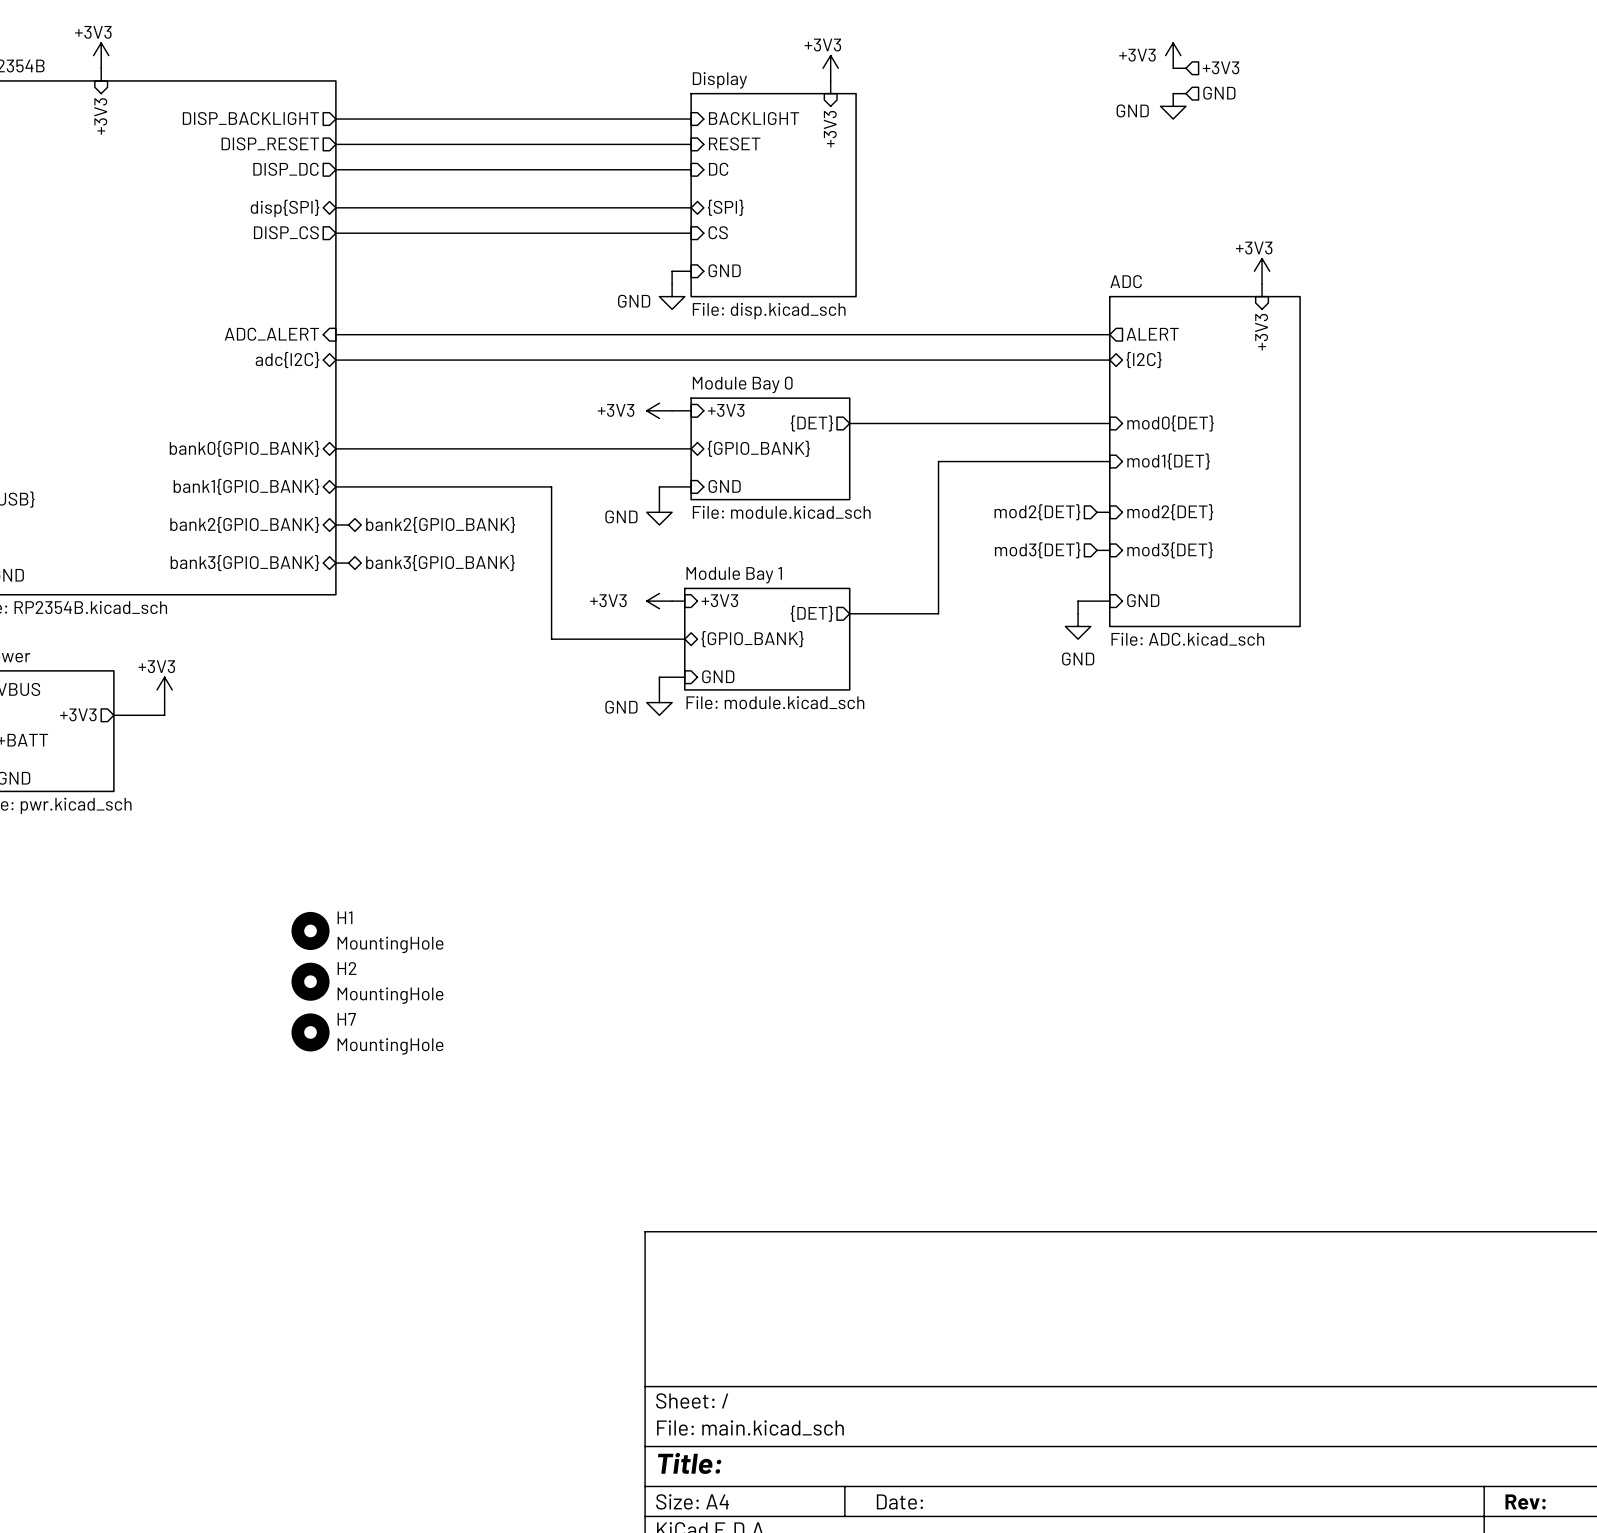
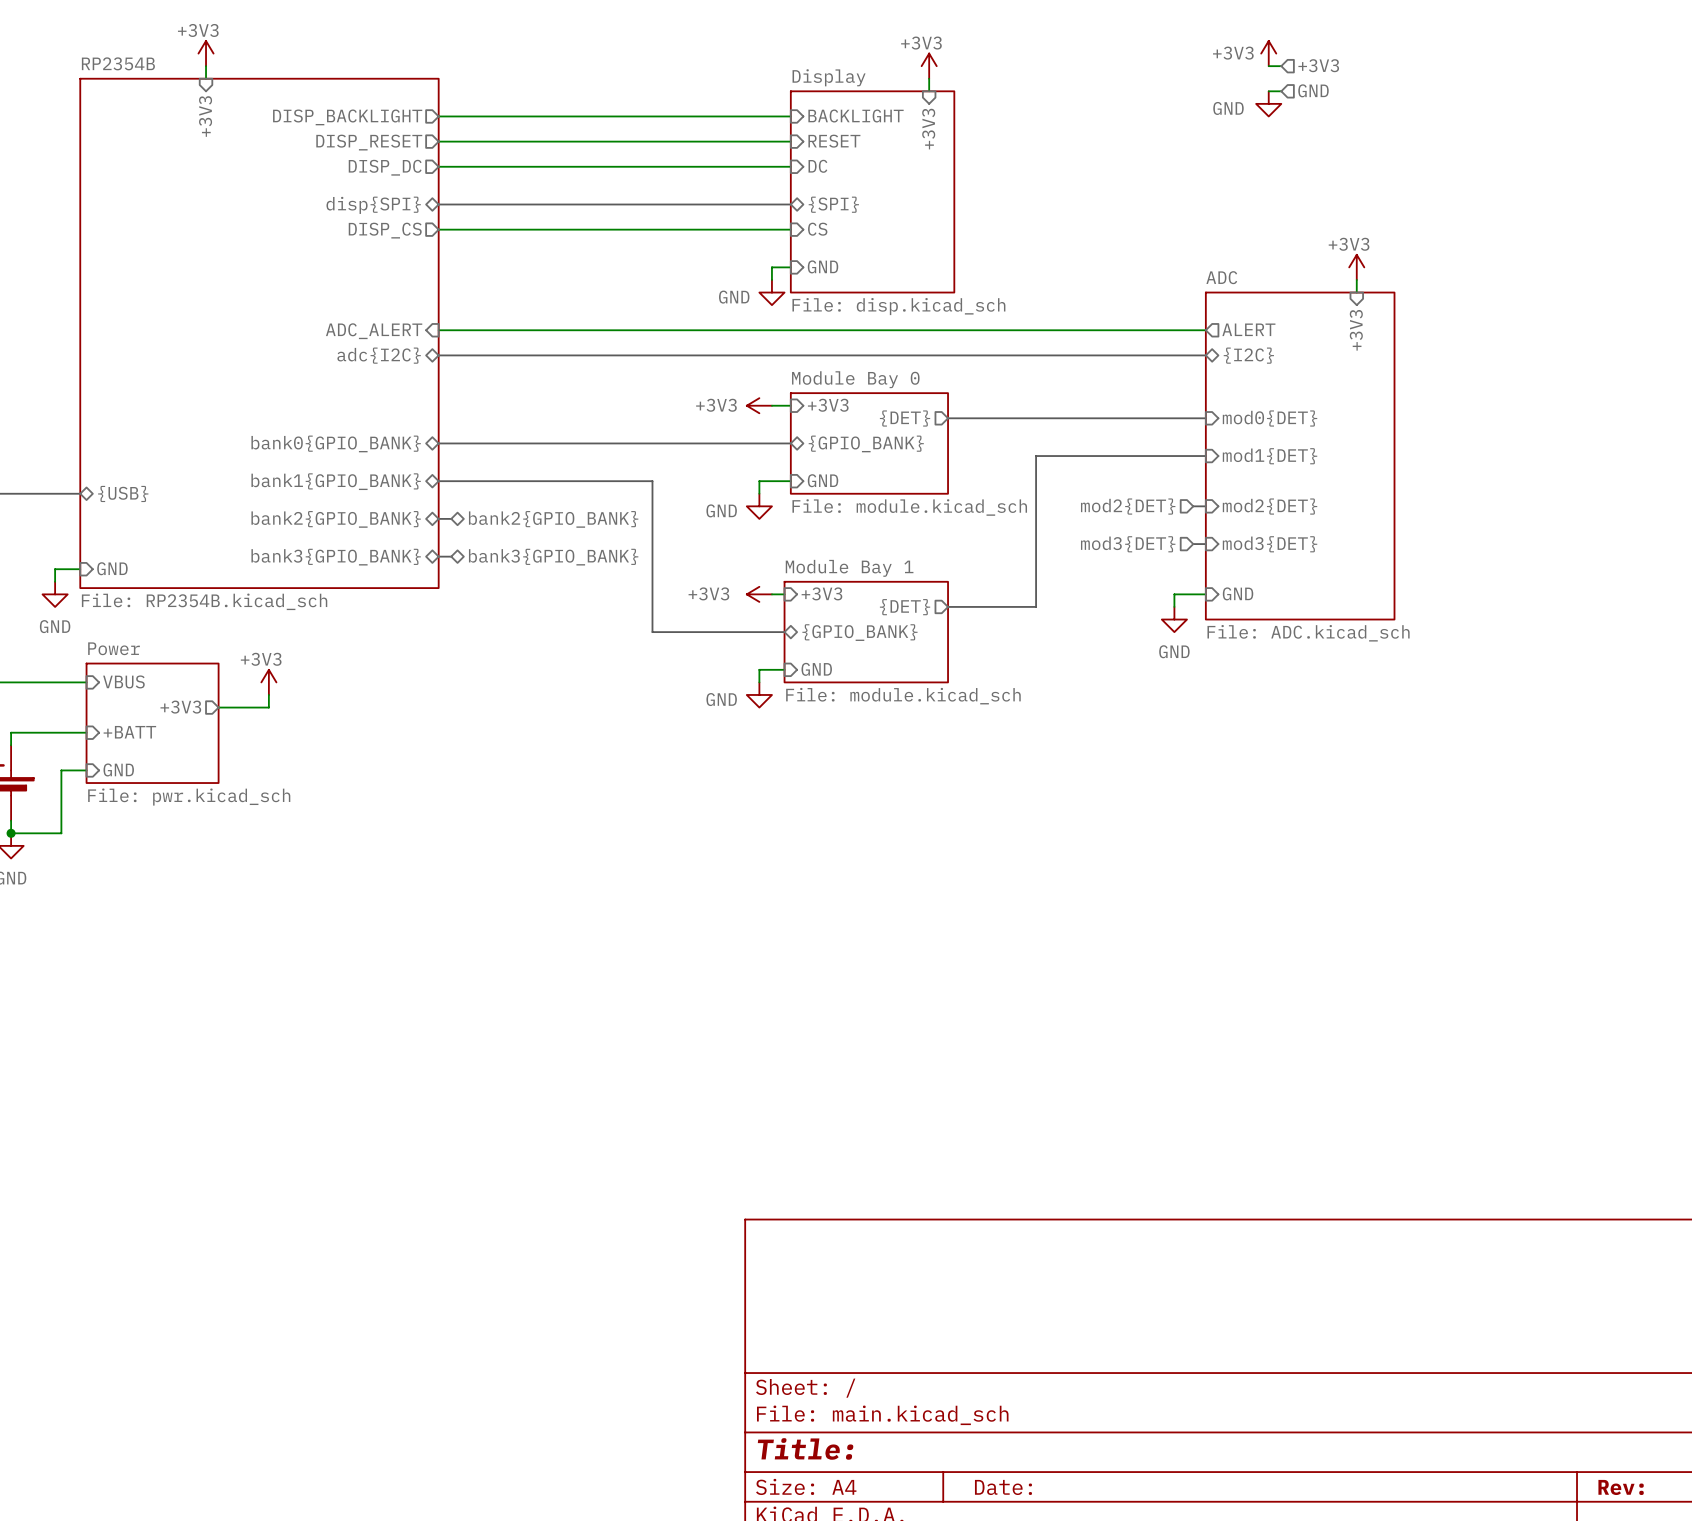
H1: MountingHole (310, 930) -> none
H2: MountingHole (310, 981) -> none
H7: MountingHole (310, 1032) -> none

